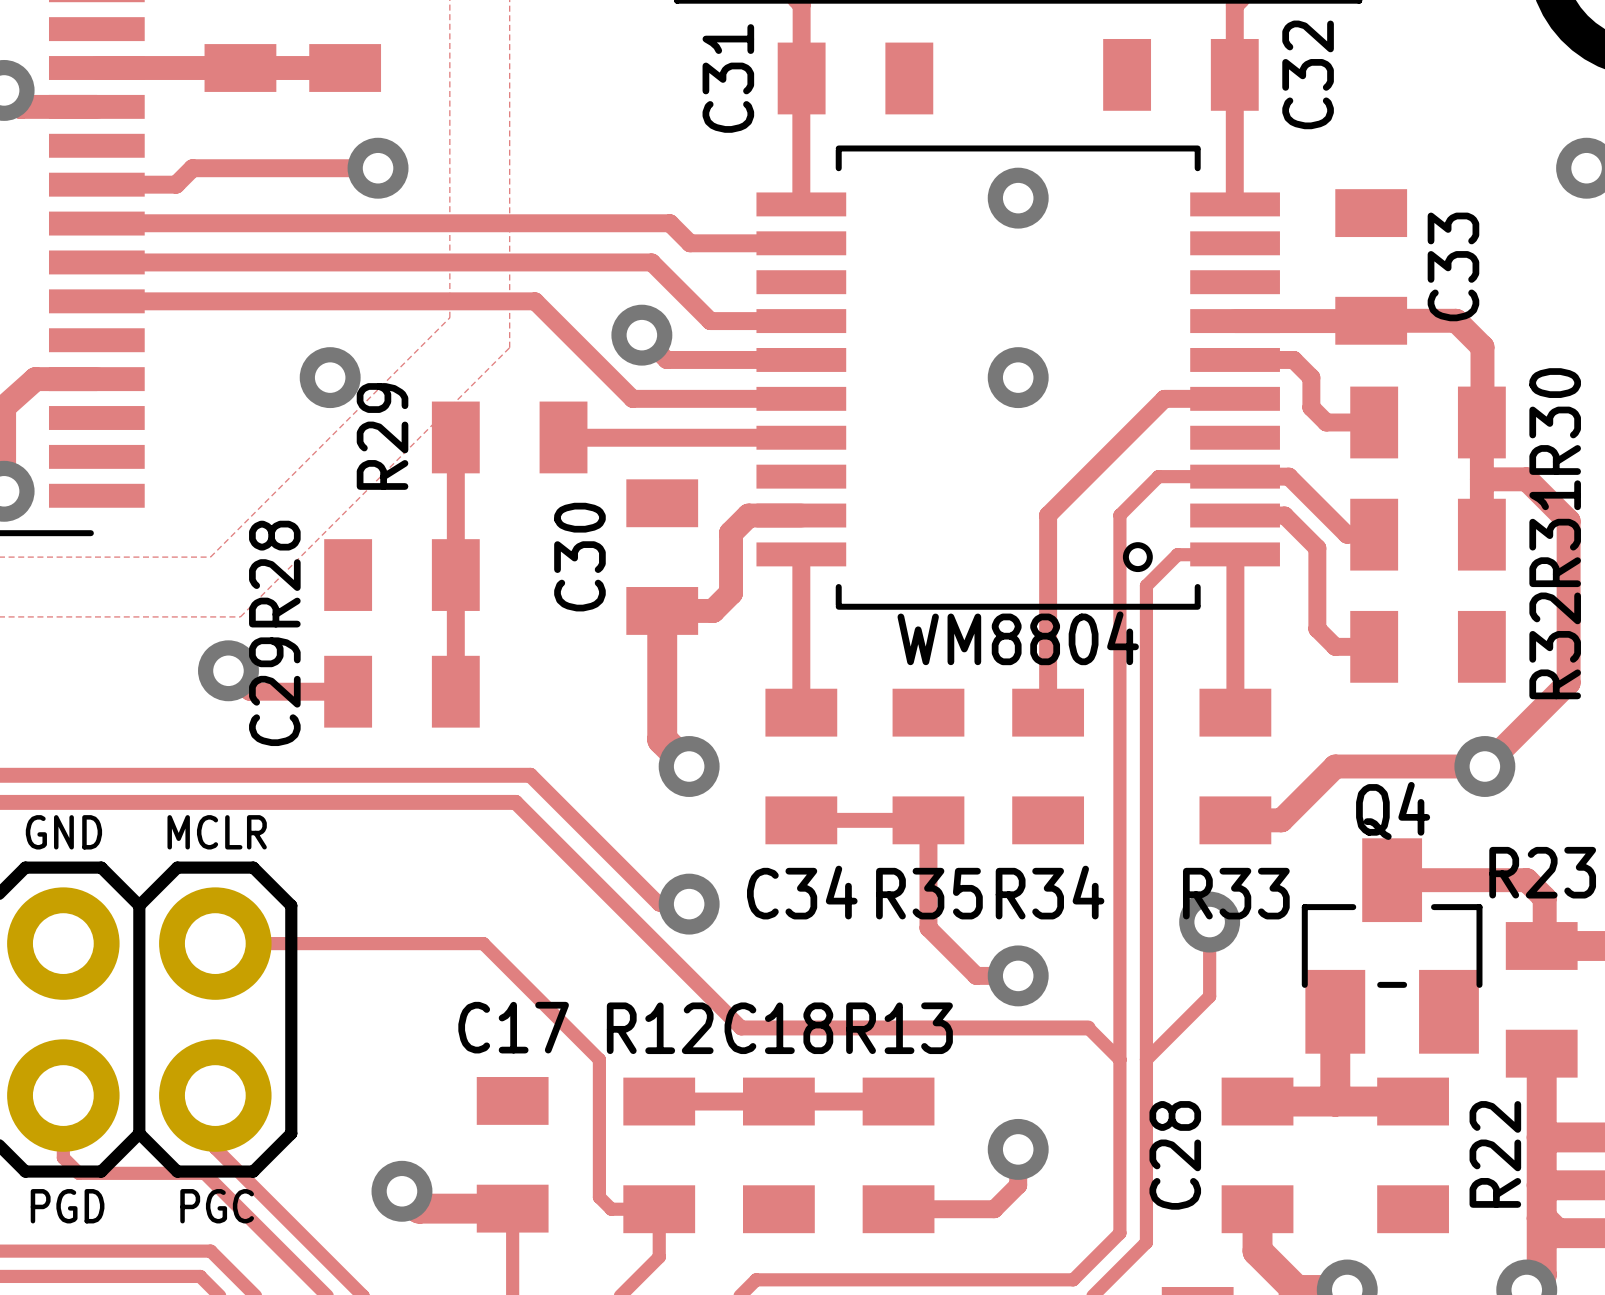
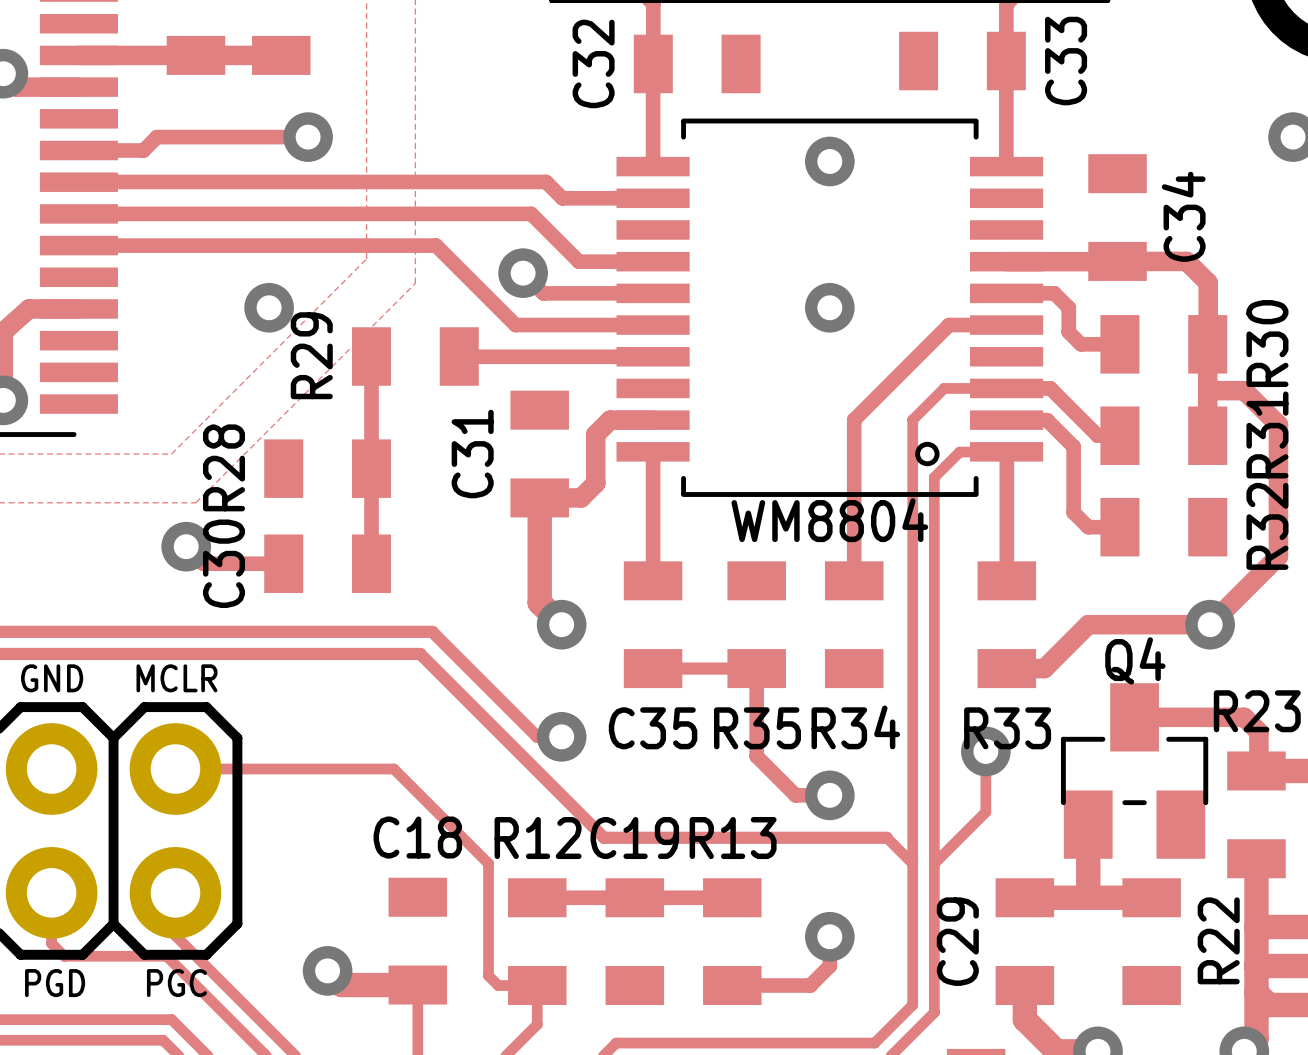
C32 name: C32 (1308, 74) -> C33 (1066, 61)
C31 name: C31 (728, 78) -> C32 (593, 63)
C33 name: C33 (1453, 266) -> C34 (1183, 216)
C30 name: C30 (579, 557) -> C31 (472, 454)
C29 name: C29 (274, 691) -> C30 (223, 563)
C34 name: C34 (802, 892) -> C35 (653, 728)
C17 name: C17 (513, 1027) -> C18 (417, 837)
C18 name: C18 (778, 1028) -> C19 (634, 838)
C28 name: C28 (1175, 1155) -> C29 (957, 941)

